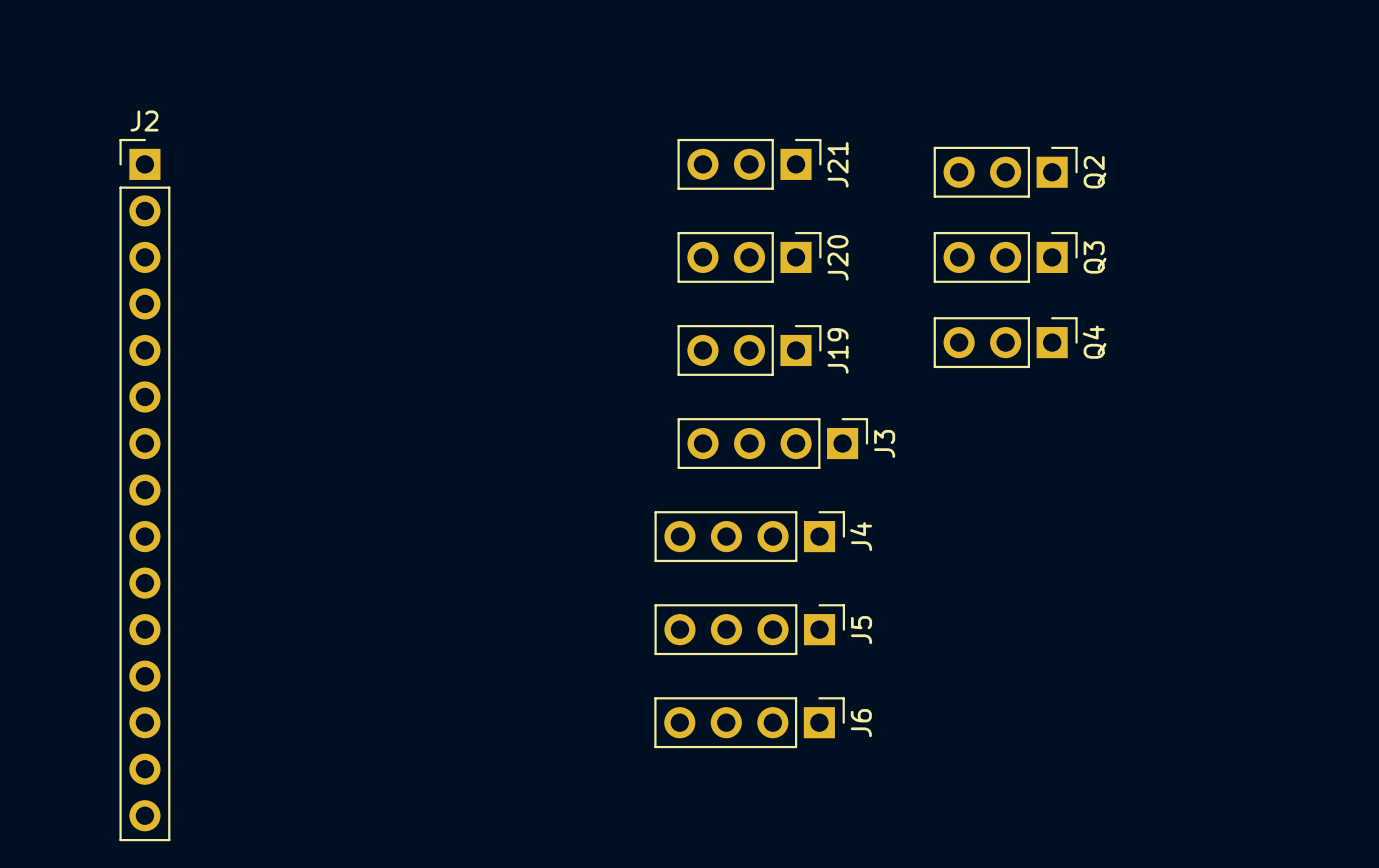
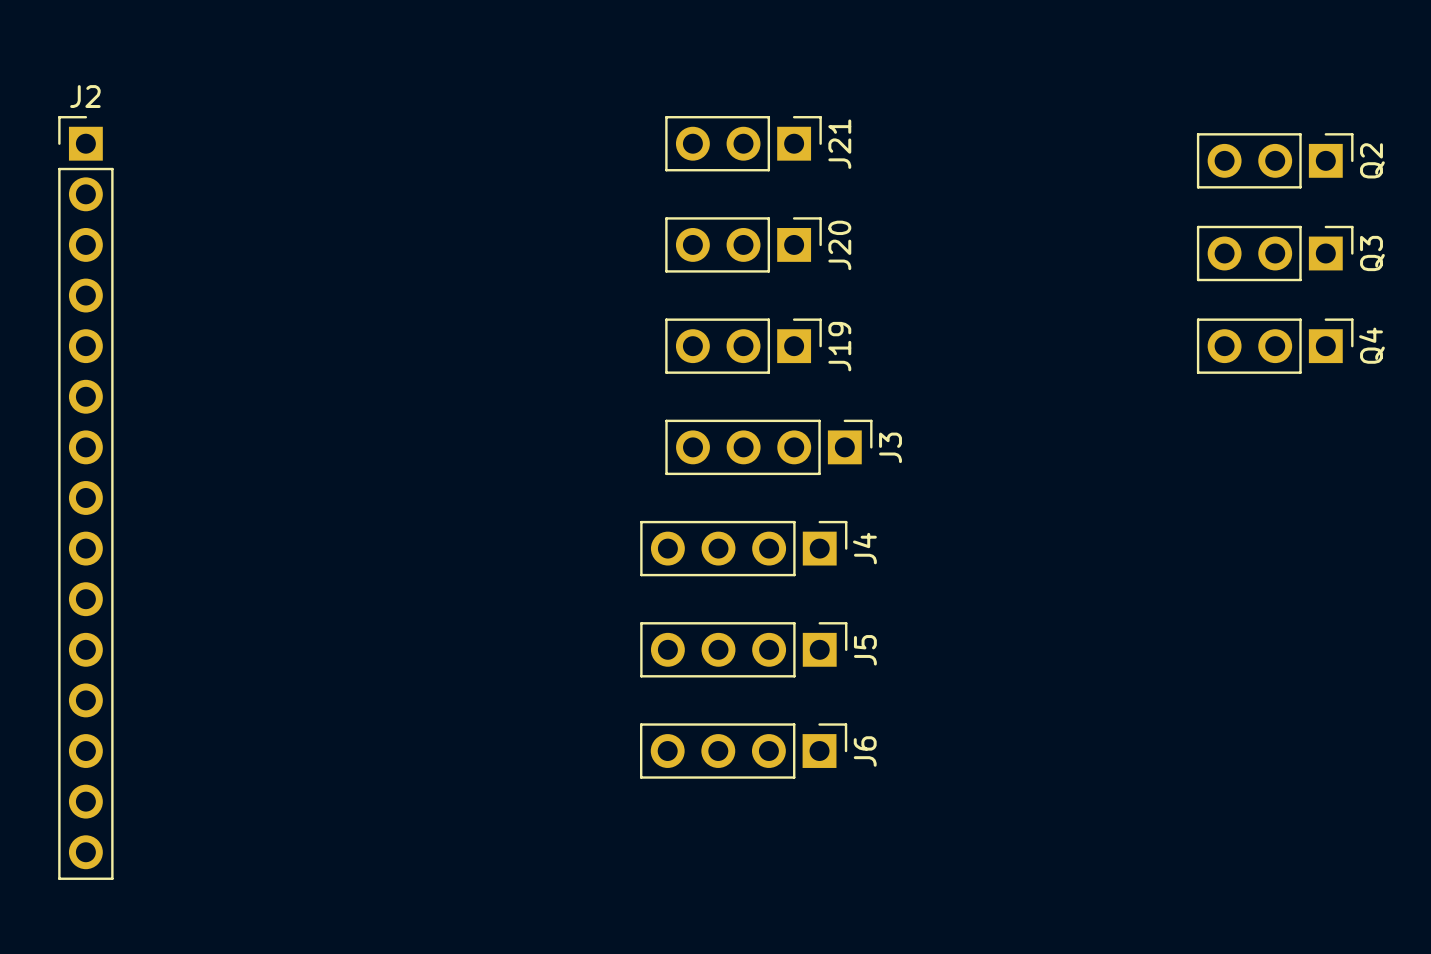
Q2 position: (1005, 172) -> (1275, 160)
Q3 position: (1005, 257) -> (1275, 253)
Q4 position: (1005, 342) -> (1275, 346)

